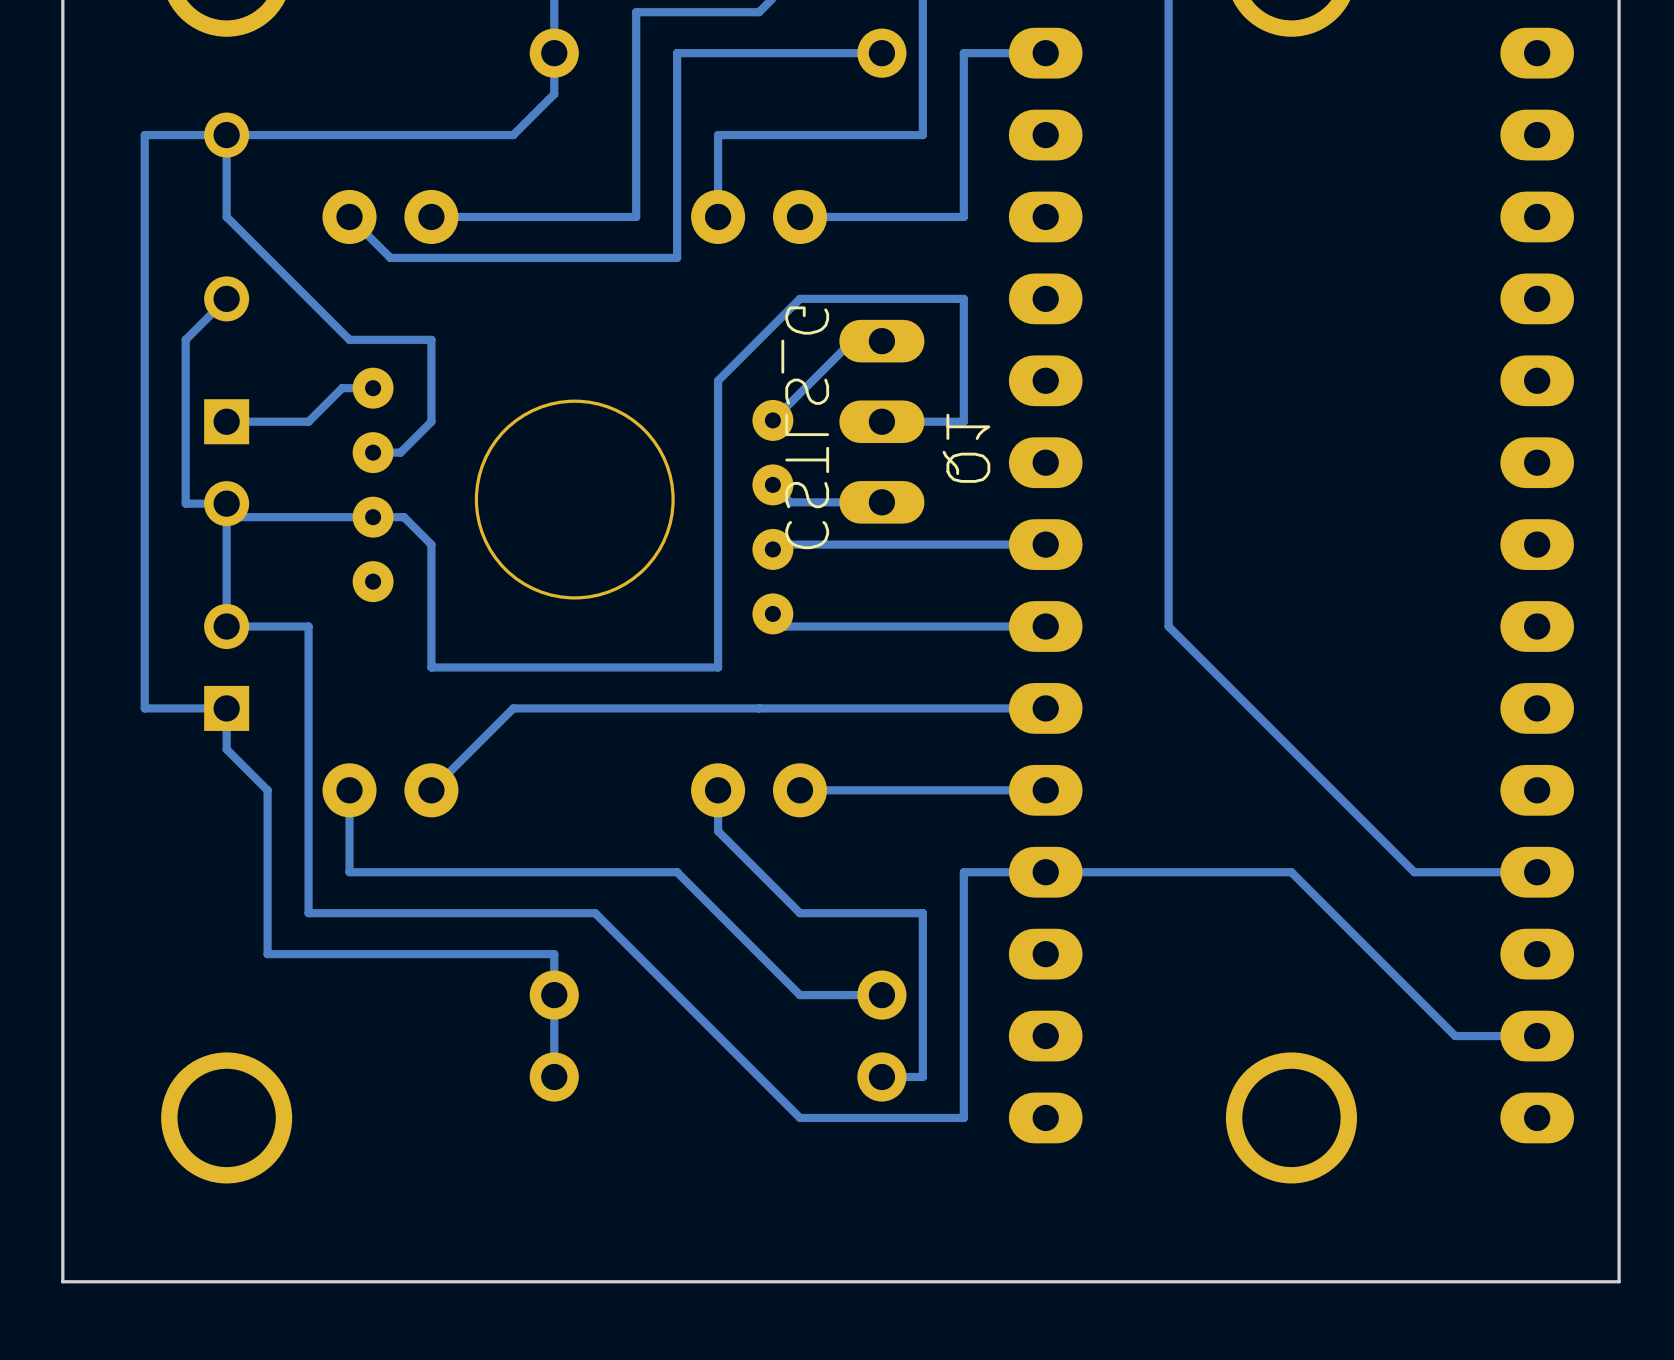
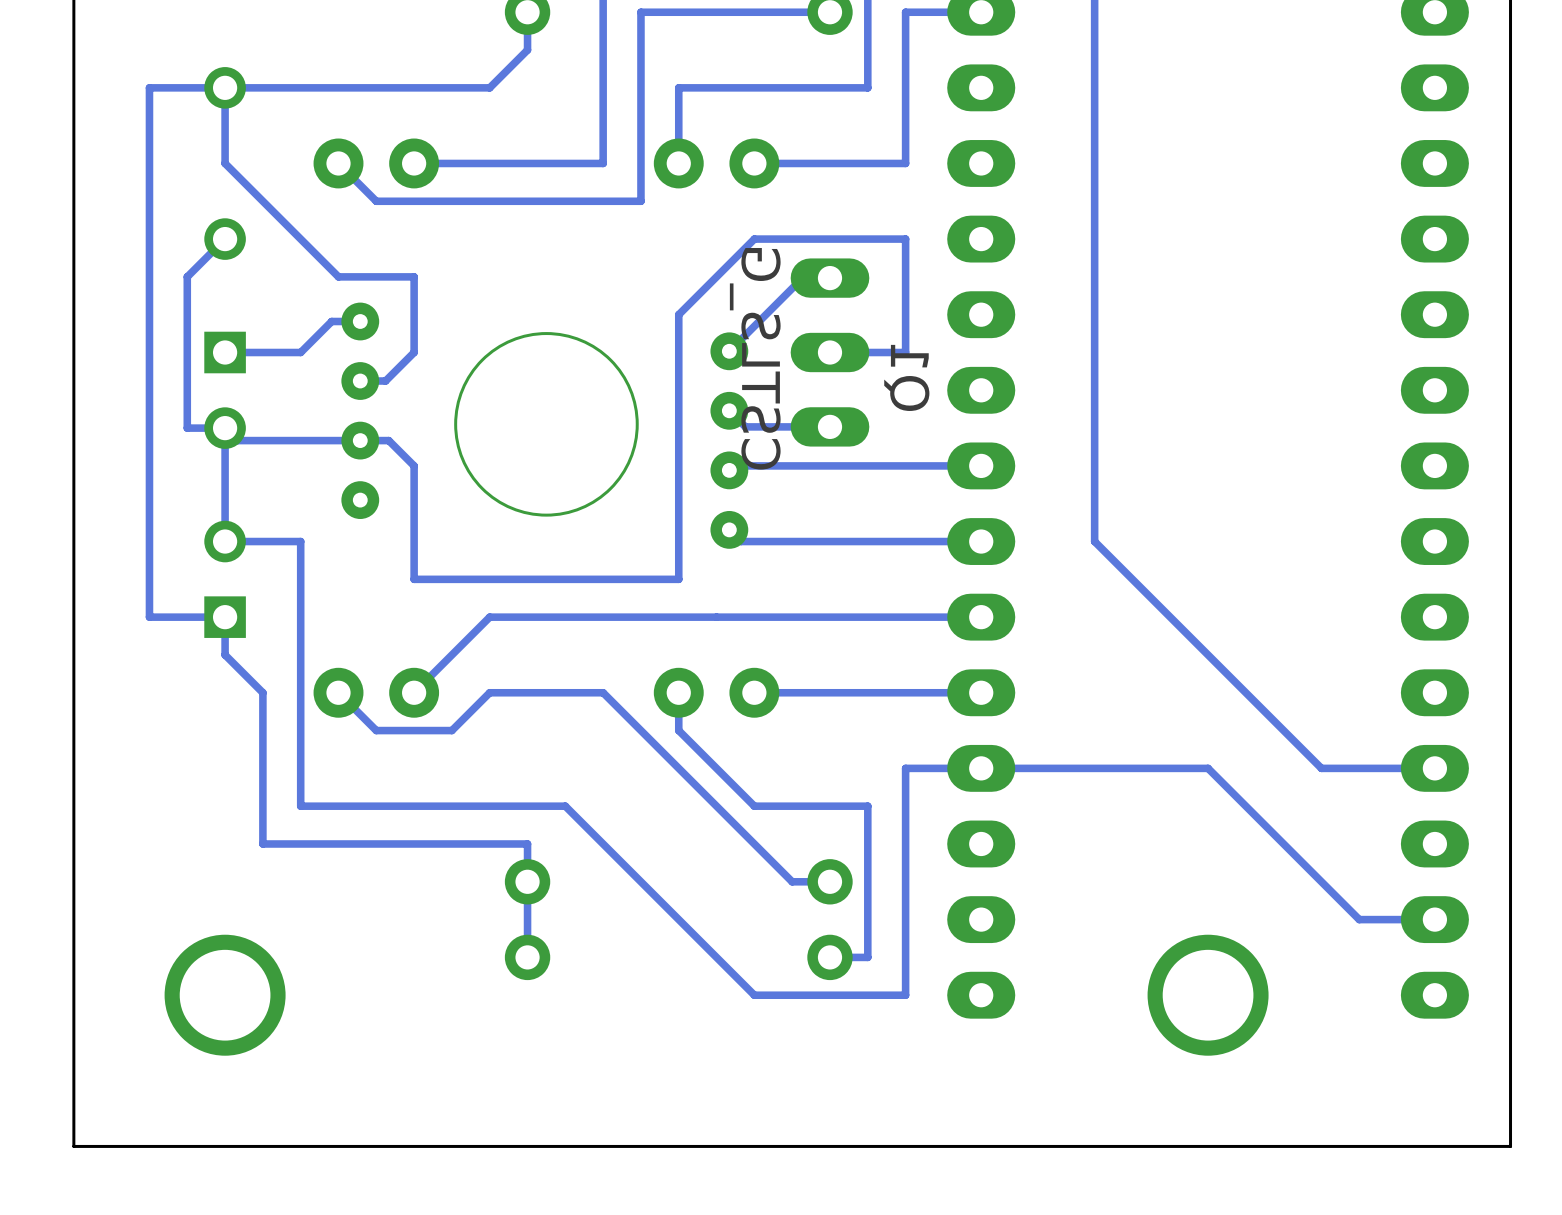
track: (349, 790) (349, 872) (677, 872) (800, 995) (840, 995) -> (338, 692) (376, 730) (451, 730) (489, 692) (603, 692) (792, 881)

